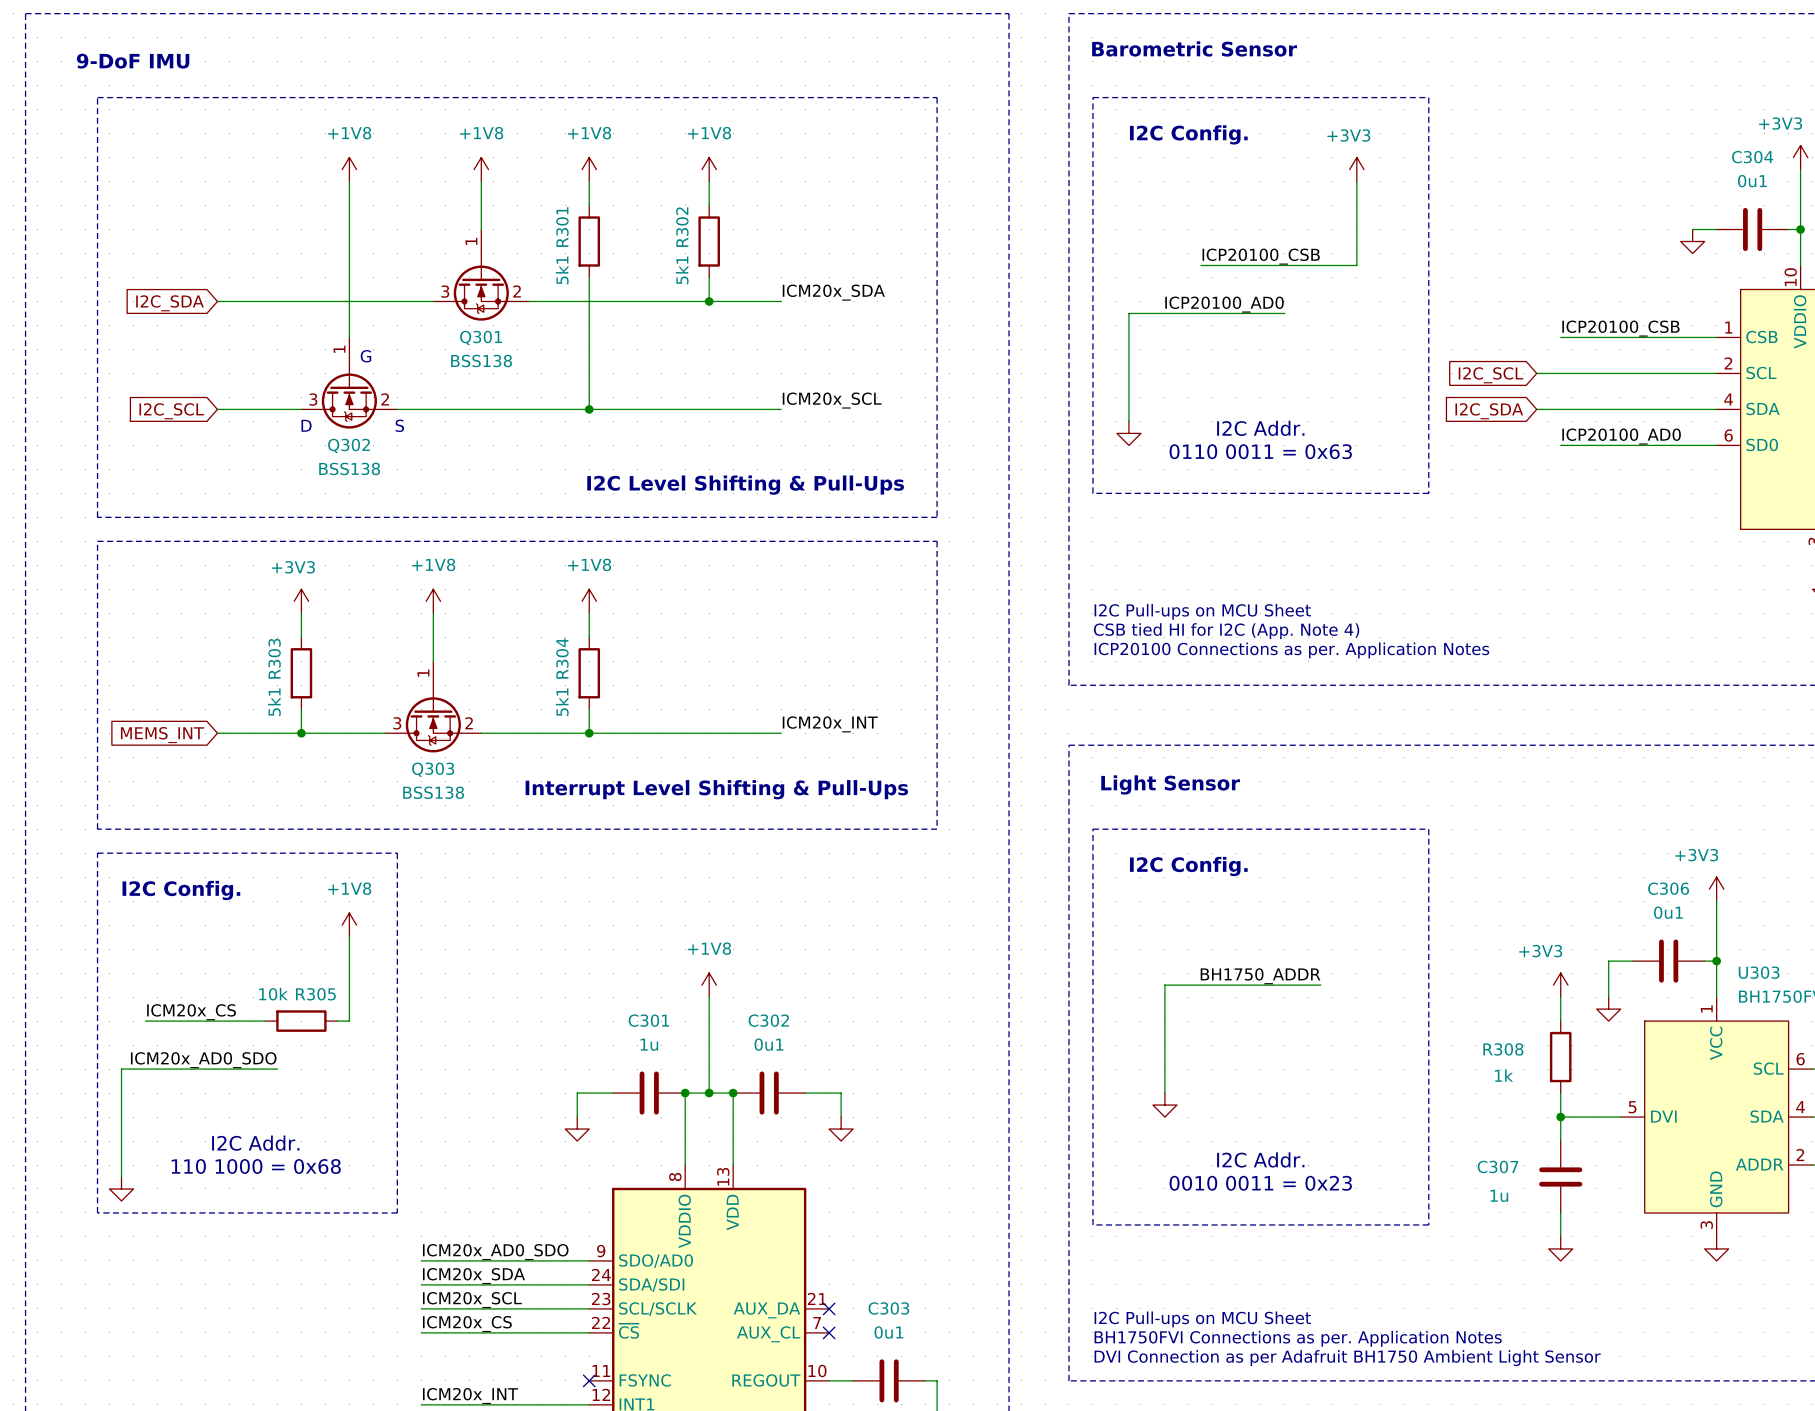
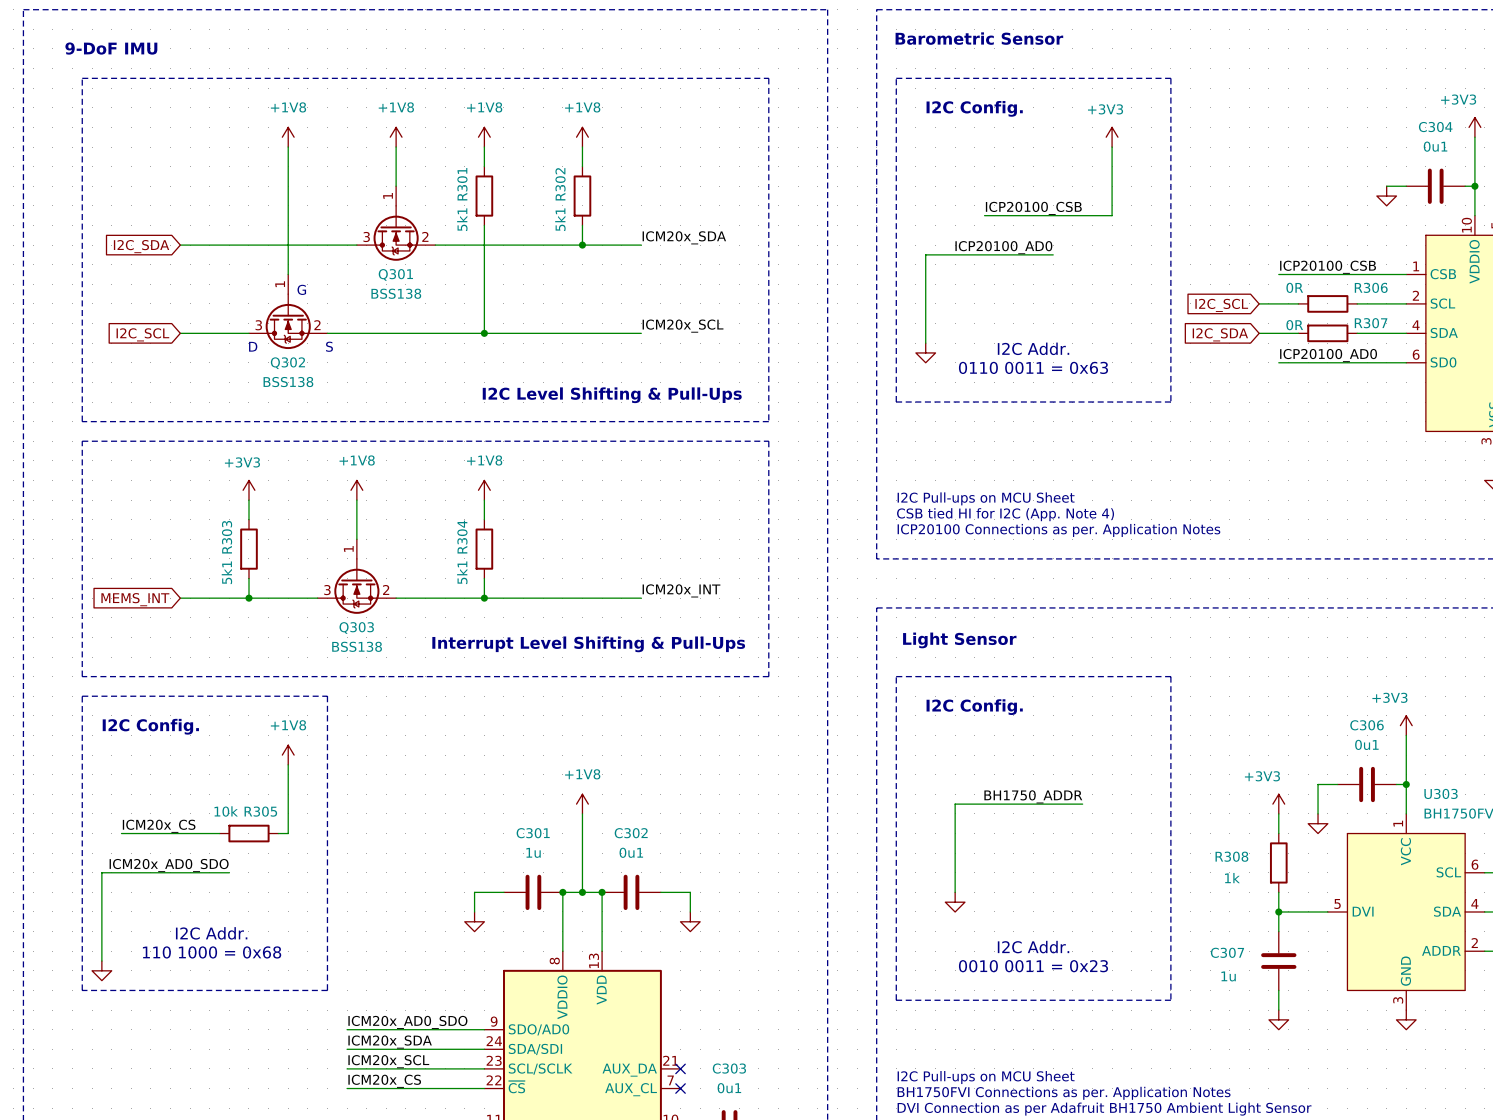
wire: (1584, 373) (1656, 373) -> none
R306: none -> 0R (1327, 303)
wire: (1584, 409) (1656, 409) -> none
R307: none -> 0R (1327, 333)

